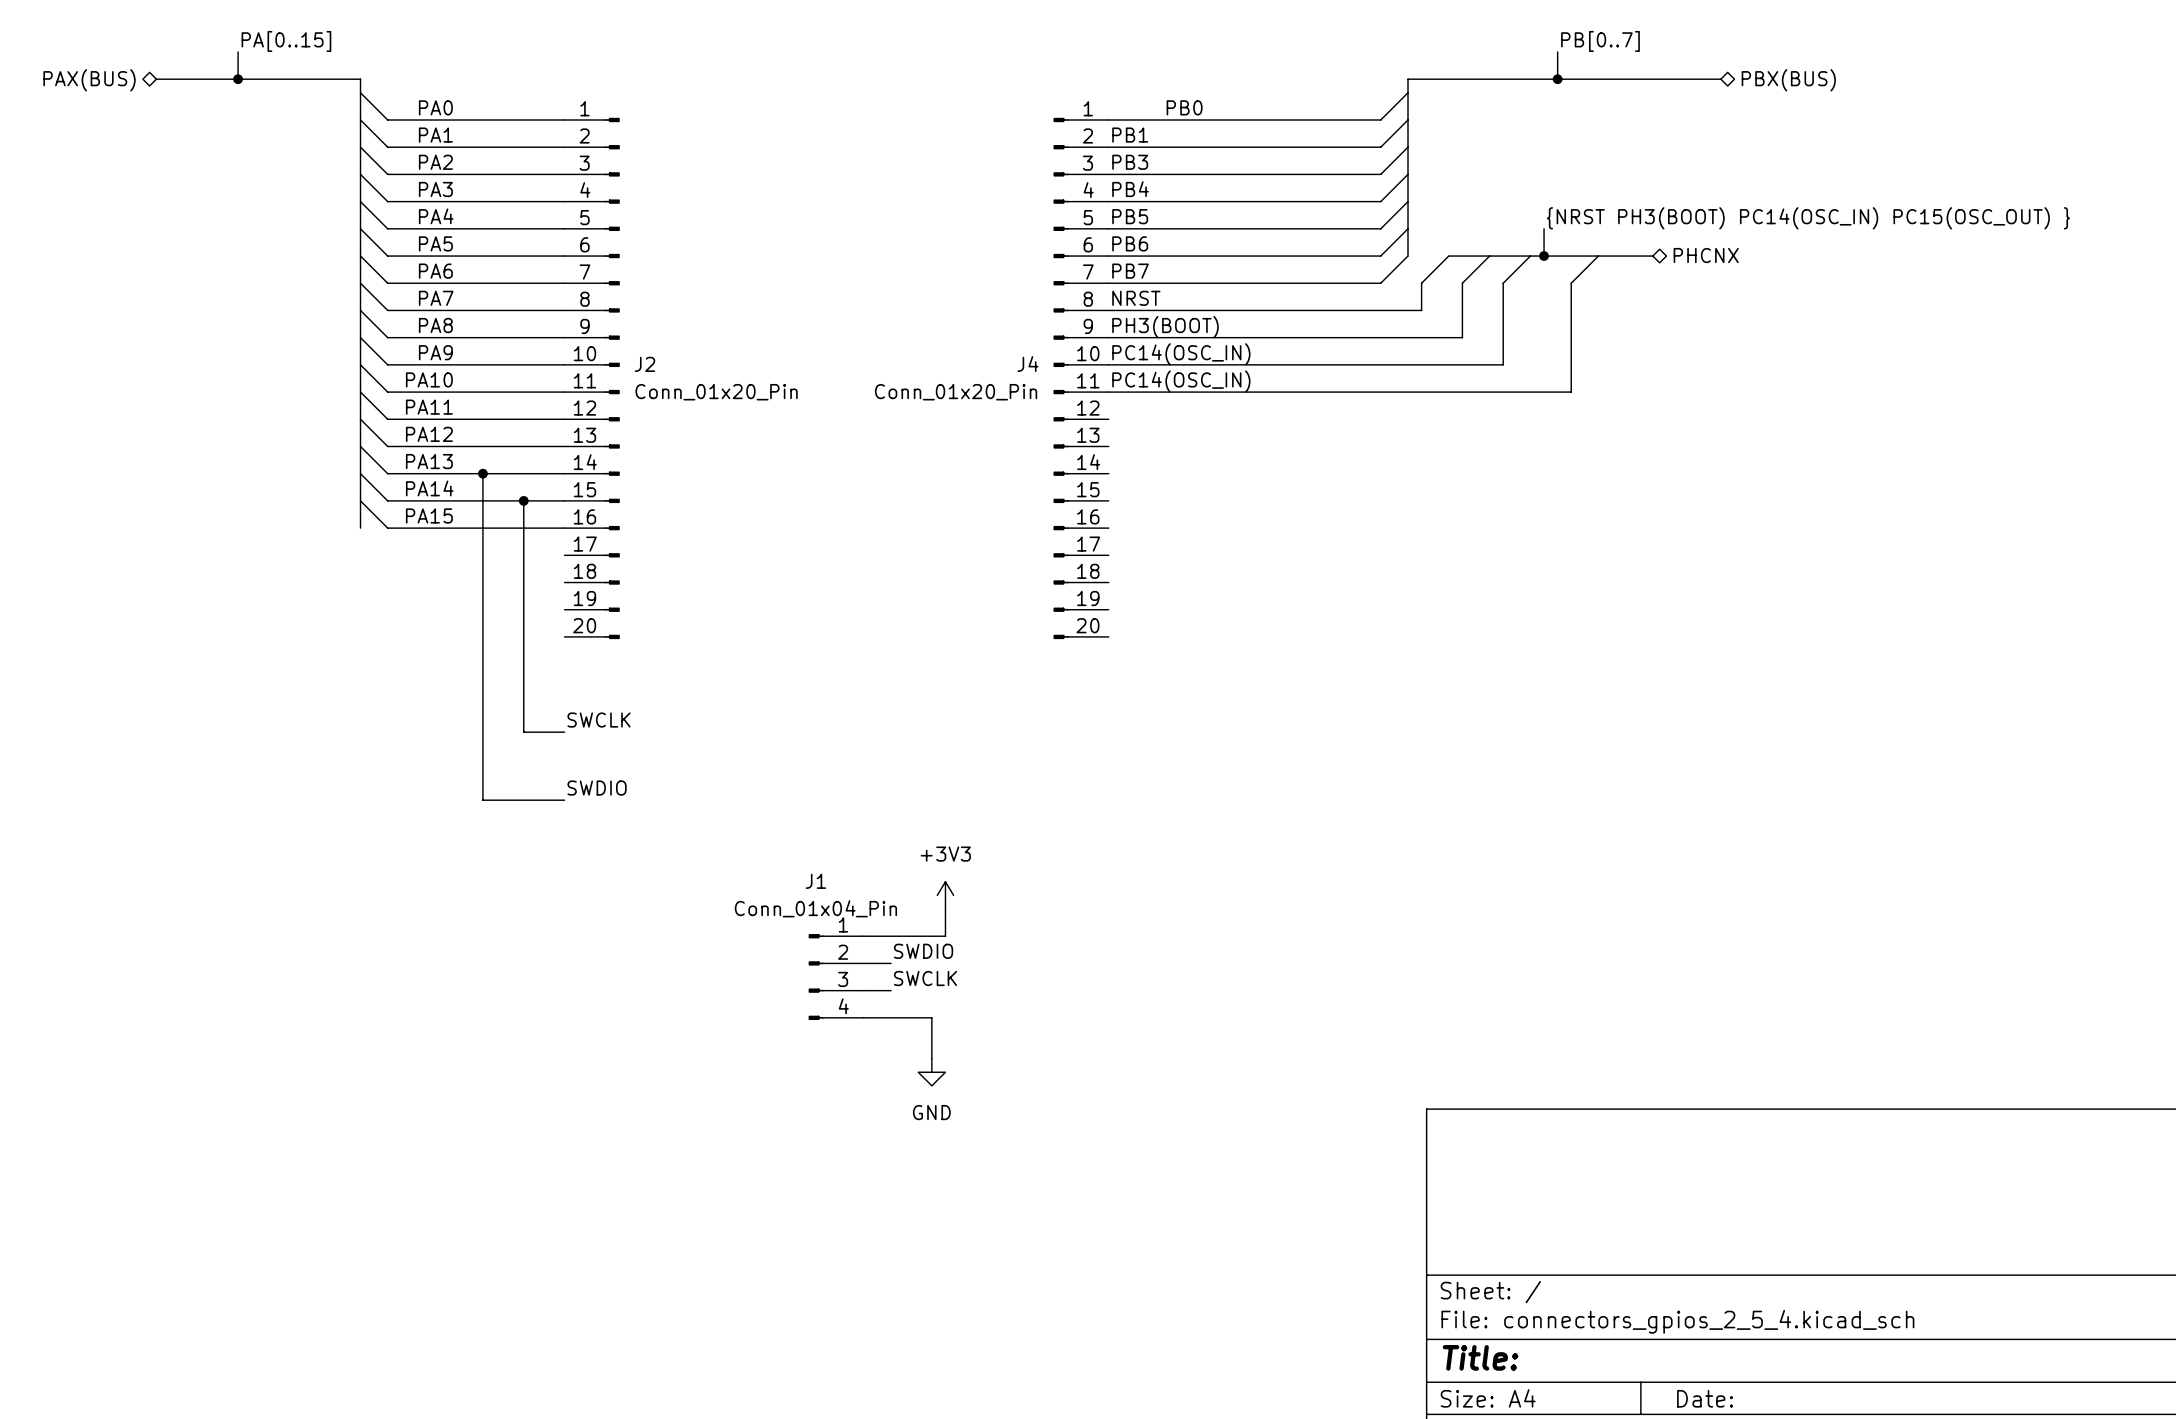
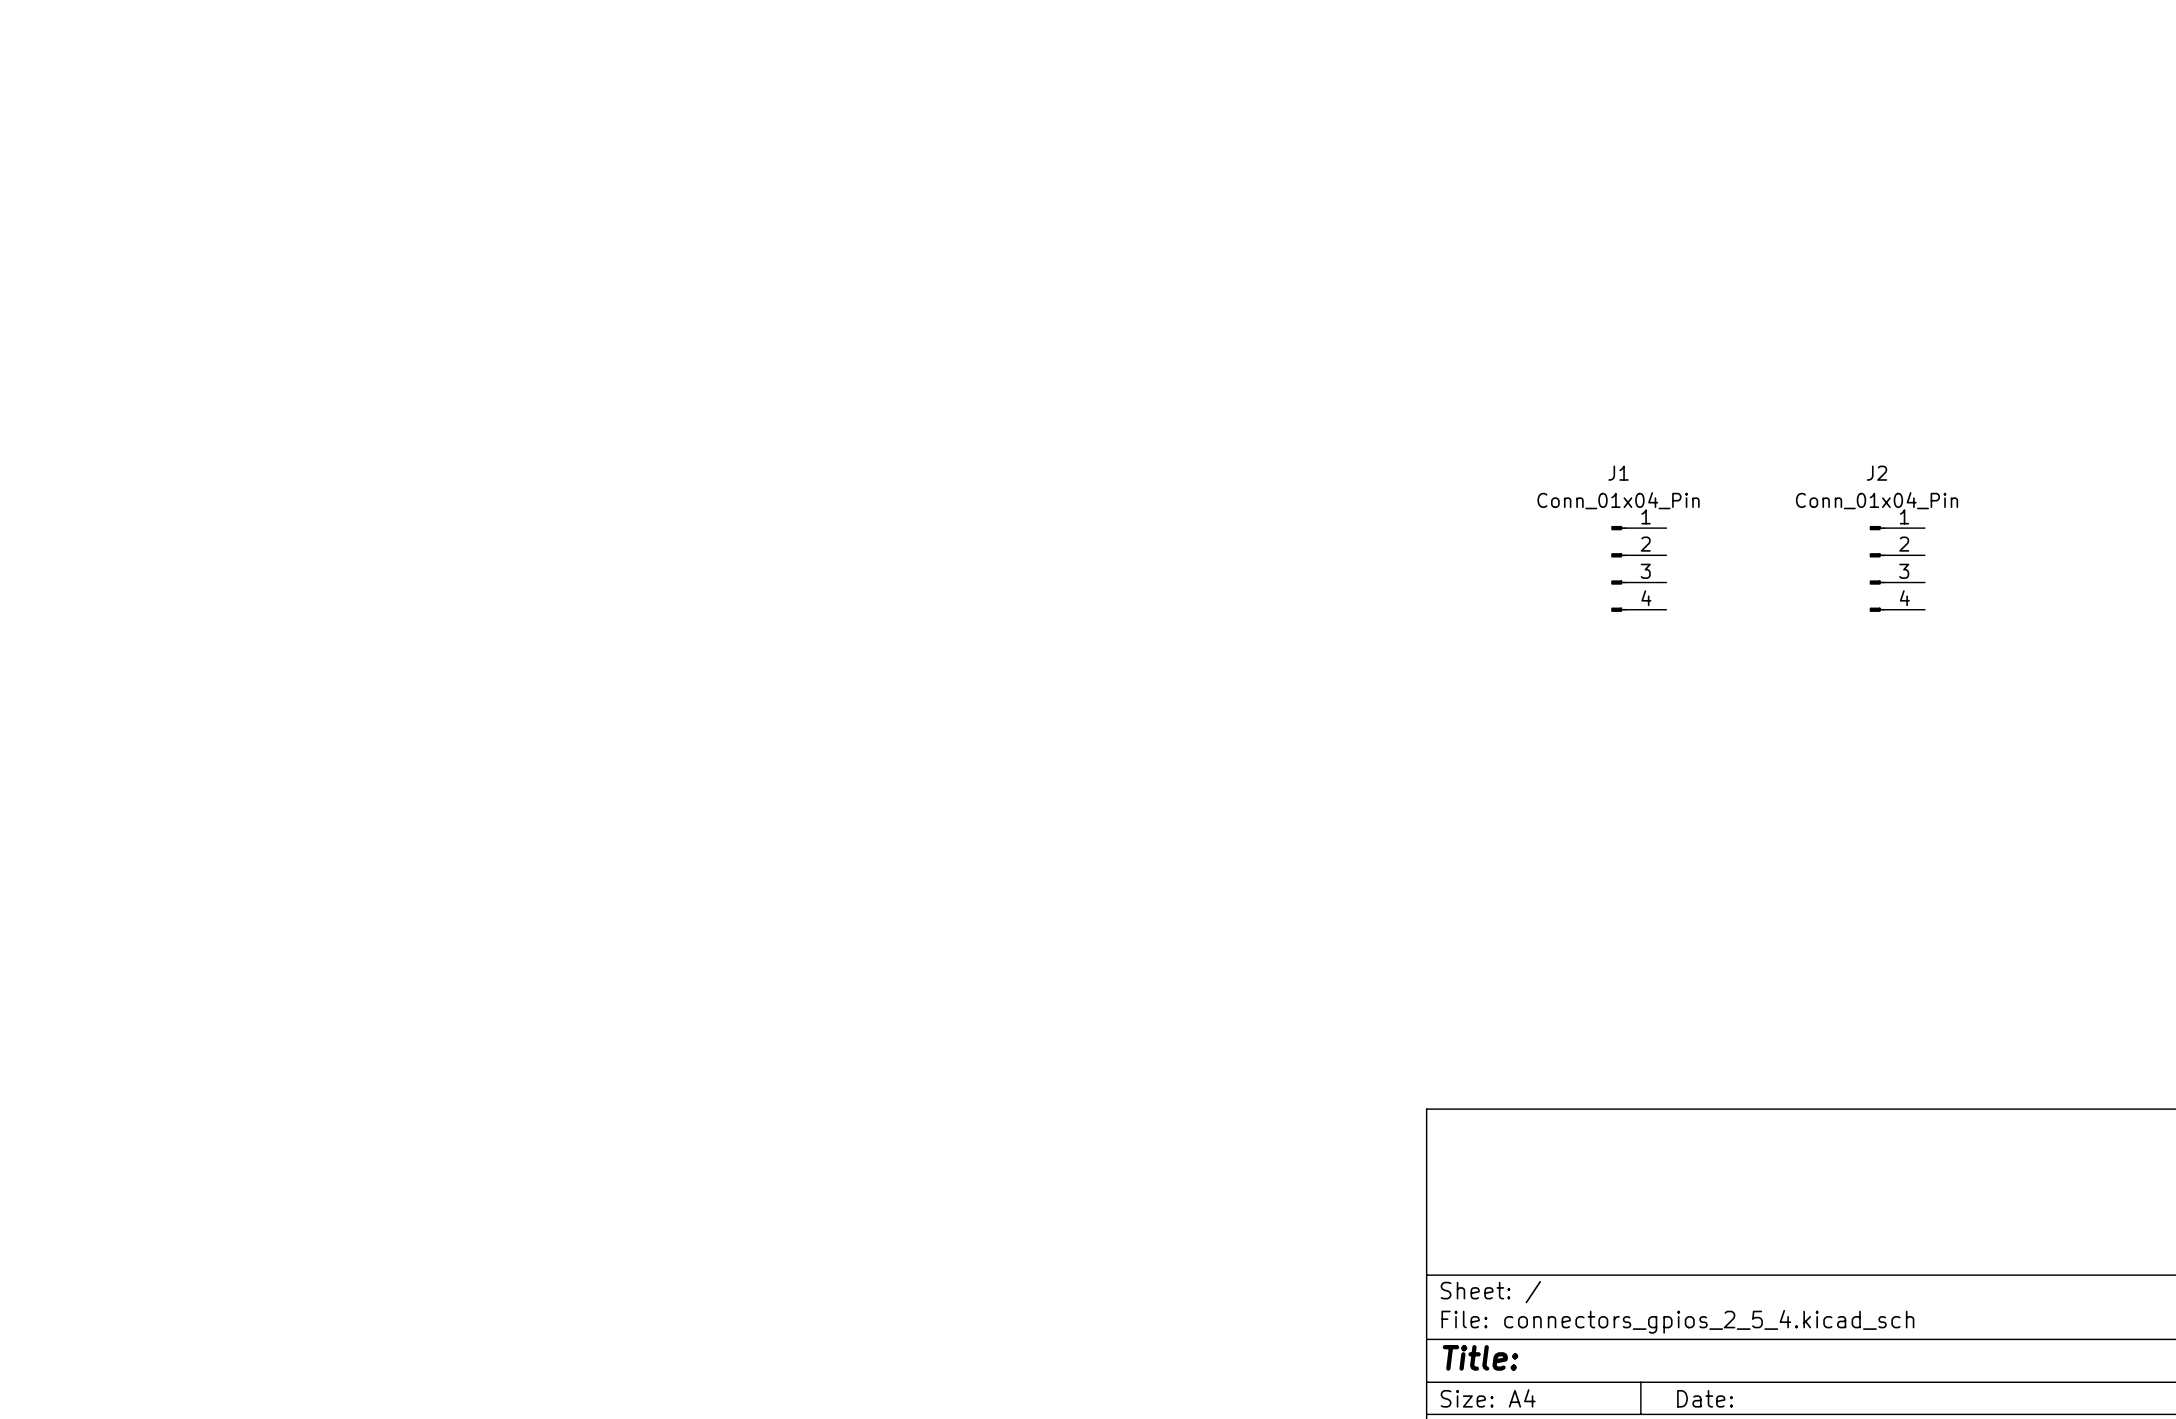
label: PA[0..15] (286, 41) -> none
label: PB[0..7] (1600, 41) -> none
bus: (238, 51) (238, 79) -> none
bus: (1557, 51) (1557, 79) -> none
bus: (156, 79) (360, 79) (360, 528) -> none
junction: (238, 79) -> none
junction: (1557, 79) -> none
bus: (1720, 79) (1408, 79) (1408, 256) -> none
hierarchical label: PAX(BUS) (89, 80) -> none
hierarchical label: PBX(BUS) (1788, 80) -> none
wire: (360, 92) (387, 120) (564, 120) -> none
wire: (1408, 92) (1380, 120) (1108, 120) -> none
label: PA0 (435, 107) -> none
label: PB0 (1184, 107) -> none
J2 symbol: [564, 117, 620, 640] -> [1869, 525, 1925, 612]
wire: (360, 120) (387, 147) (564, 147) -> none
wire: (1408, 120) (1380, 147) (1108, 147) -> none
label: PA1 (435, 135) -> none
label: PB1 (1130, 135) -> none
wire: (360, 147) (387, 174) (564, 174) -> none
wire: (1408, 147) (1380, 174) (1108, 174) -> none
label: PA2 (435, 162) -> none
label: PB3 (1130, 162) -> none
wire: (360, 174) (387, 201) (564, 201) -> none
wire: (1408, 174) (1380, 201) (1108, 201) -> none
label: PA3 (435, 189) -> none
label: PB4 (1130, 189) -> none
wire: (360, 201) (387, 228) (564, 228) -> none
wire: (1408, 201) (1380, 228) (1108, 228) -> none
label: PA4 (436, 216) -> none
label: PB5 (1130, 216) -> none
label: {NRST PH3(BOOT) PC14(OSC_IN) PC15(OSC_OUT) } (1808, 218) -> none
wire: (360, 228) (387, 256) (564, 256) -> none
wire: (1408, 228) (1380, 256) (1108, 256) -> none
bus: (1544, 228) (1544, 256) -> none
label: PA5 (435, 243) -> none
label: PB6 (1130, 243) -> none
hierarchical label: PHCNX (1706, 255) -> none
wire: (360, 256) (387, 283) (564, 283) -> none
wire: (1408, 256) (1380, 283) (1108, 283) -> none
wire: (1448, 256) (1421, 283) (1421, 310) (1108, 310) -> none
bus: (1448, 256) (1652, 256) -> none
wire: (1489, 256) (1462, 283) (1462, 337) (1108, 337) -> none
wire: (1530, 256) (1503, 283) (1503, 364) (1108, 364) -> none
junction: (1544, 256) -> none
wire: (1598, 256) (1571, 283) (1571, 392) (1108, 392) -> none
label: PA6 (435, 271) -> none
label: PB7 (1130, 271) -> none
wire: (360, 283) (387, 310) (564, 310) -> none
label: PA7 (436, 298) -> none
label: NRST (1136, 298) -> none
wire: (360, 310) (387, 337) (564, 337) -> none
label: PA8 (435, 325) -> none
label: PH3(BOOT) (1165, 327) -> none
wire: (360, 337) (387, 364) (564, 364) -> none
label: PA9 (435, 352) -> none
label: PC14(OSC_IN) (1181, 354) -> none
wire: (360, 364) (387, 392) (564, 392) -> none
J2 name position: J2 (644, 364) -> J2 (1877, 473)
J4: Conn_01x20_Pin (1081, 378) -> none
label: PA10 (429, 379) -> none
label: PC14(OSC_IN) (1181, 381) -> none
wire: (360, 392) (387, 419) (564, 419) -> none
J2 value: Conn_01x20_Pin (716, 392) -> Conn_01x04_Pin (1877, 500)
label: PA11 (429, 407) -> none
wire: (360, 419) (387, 446) (564, 446) -> none
label: PA12 (429, 434) -> none
wire: (360, 446) (387, 473) (564, 473) -> none
label: PA13 (429, 461) -> none
wire: (360, 473) (387, 500) (564, 500) -> none
wire: (482, 473) (482, 800) (564, 800) -> none
junction: (482, 473) -> none
label: PA14 (429, 488) -> none
wire: (360, 500) (387, 528) (564, 528) -> none
wire: (523, 500) (523, 732) (564, 732) -> none
junction: (523, 500) -> none
label: PA15 (429, 515) -> none
label: SWCLK (599, 720) -> none
label: SWDIO (597, 788) -> none
power symbol: +3V3 (945, 895) -> none
wire: (945, 909) (945, 936) (863, 936) -> none
label: SWDIO (923, 951) -> none
wire: (863, 963) (891, 963) -> none
J1 position: (836, 977) -> (1638, 568)
label: SWCLK (925, 978) -> none
wire: (863, 990) (891, 990) -> none
wire: (863, 1017) (931, 1017) (931, 1058) -> none
power symbol: GND (931, 1072) -> none

